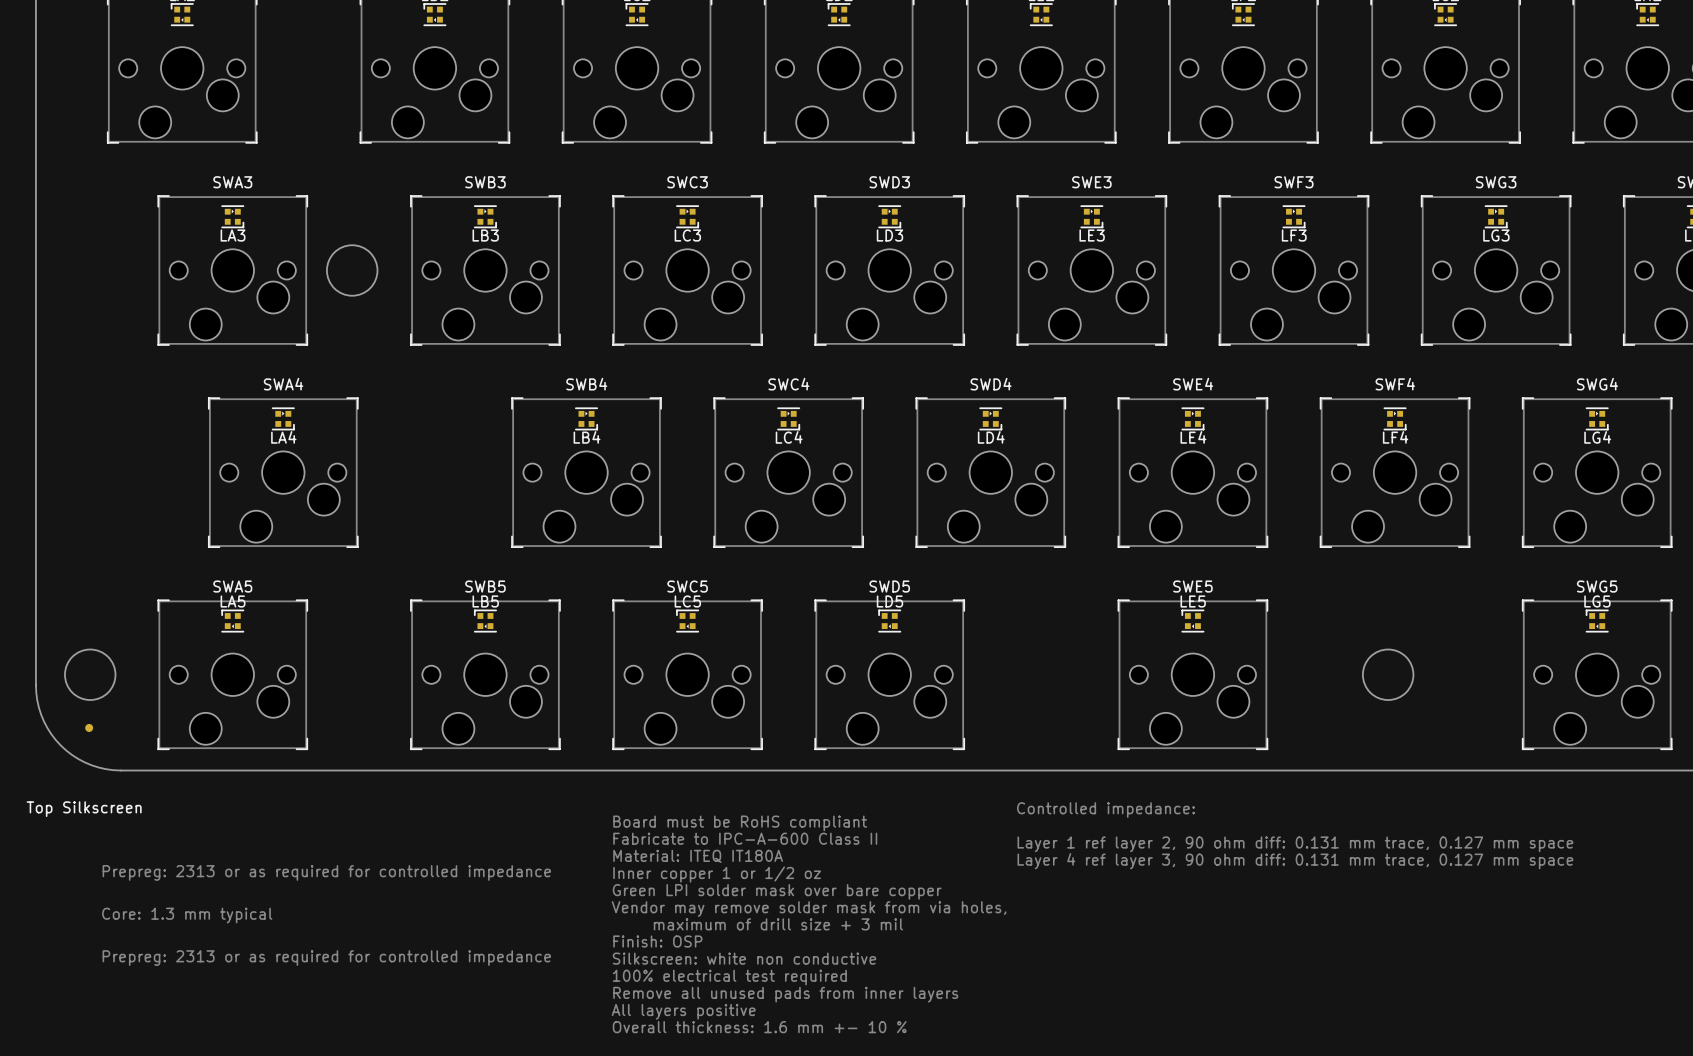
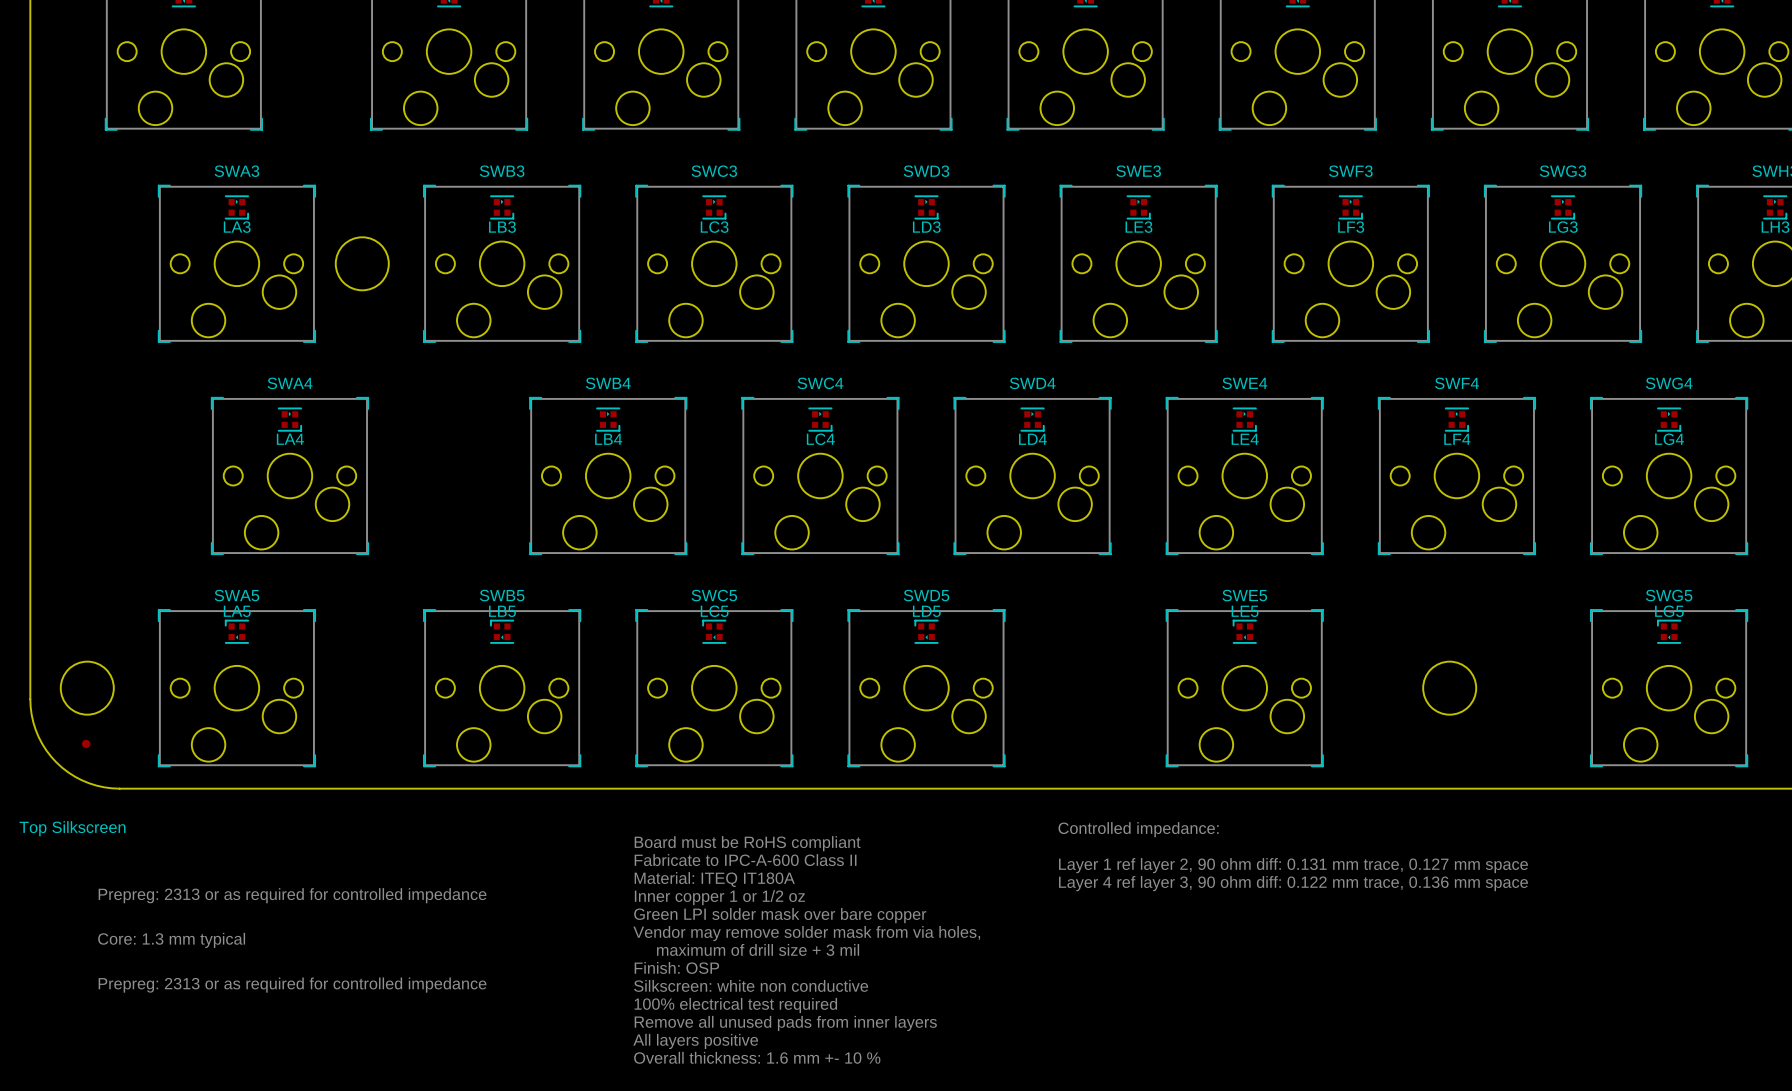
text: Layer 4 ref layer 3, 90 ohm diff: 0.131 mm trace, 0.127 mm space (1295, 861) -> Layer 4 ref layer 3, 90 ohm diff: 0.122 mm trace, 0.136 mm space (1293, 883)

